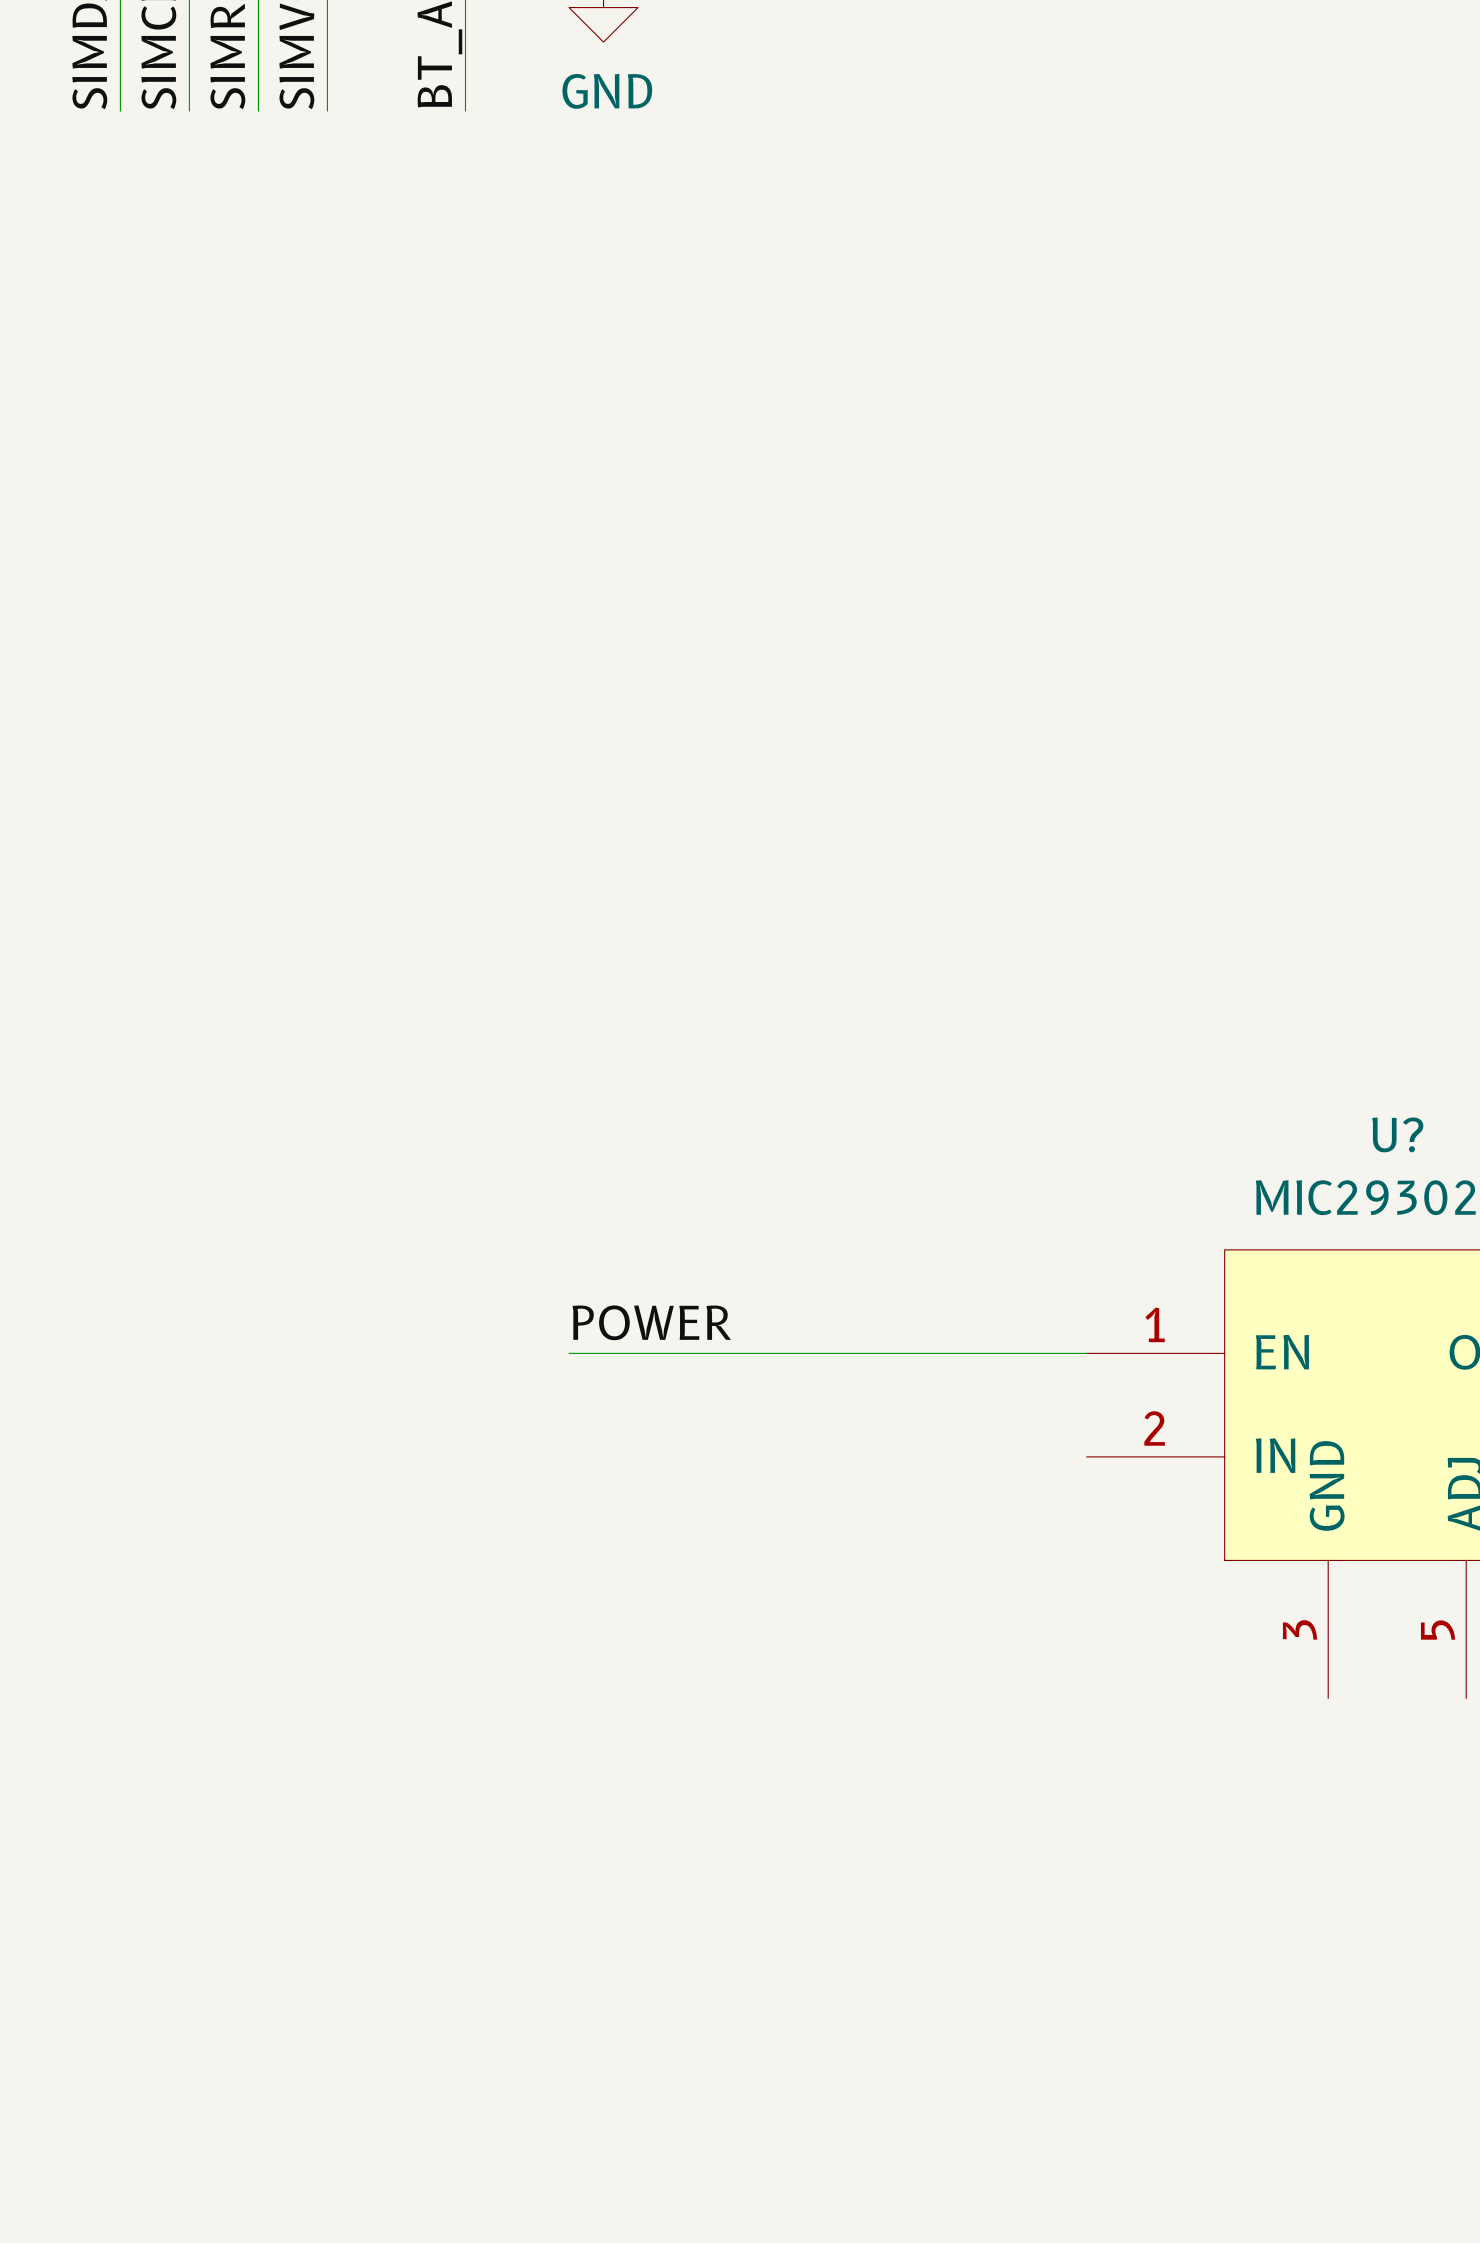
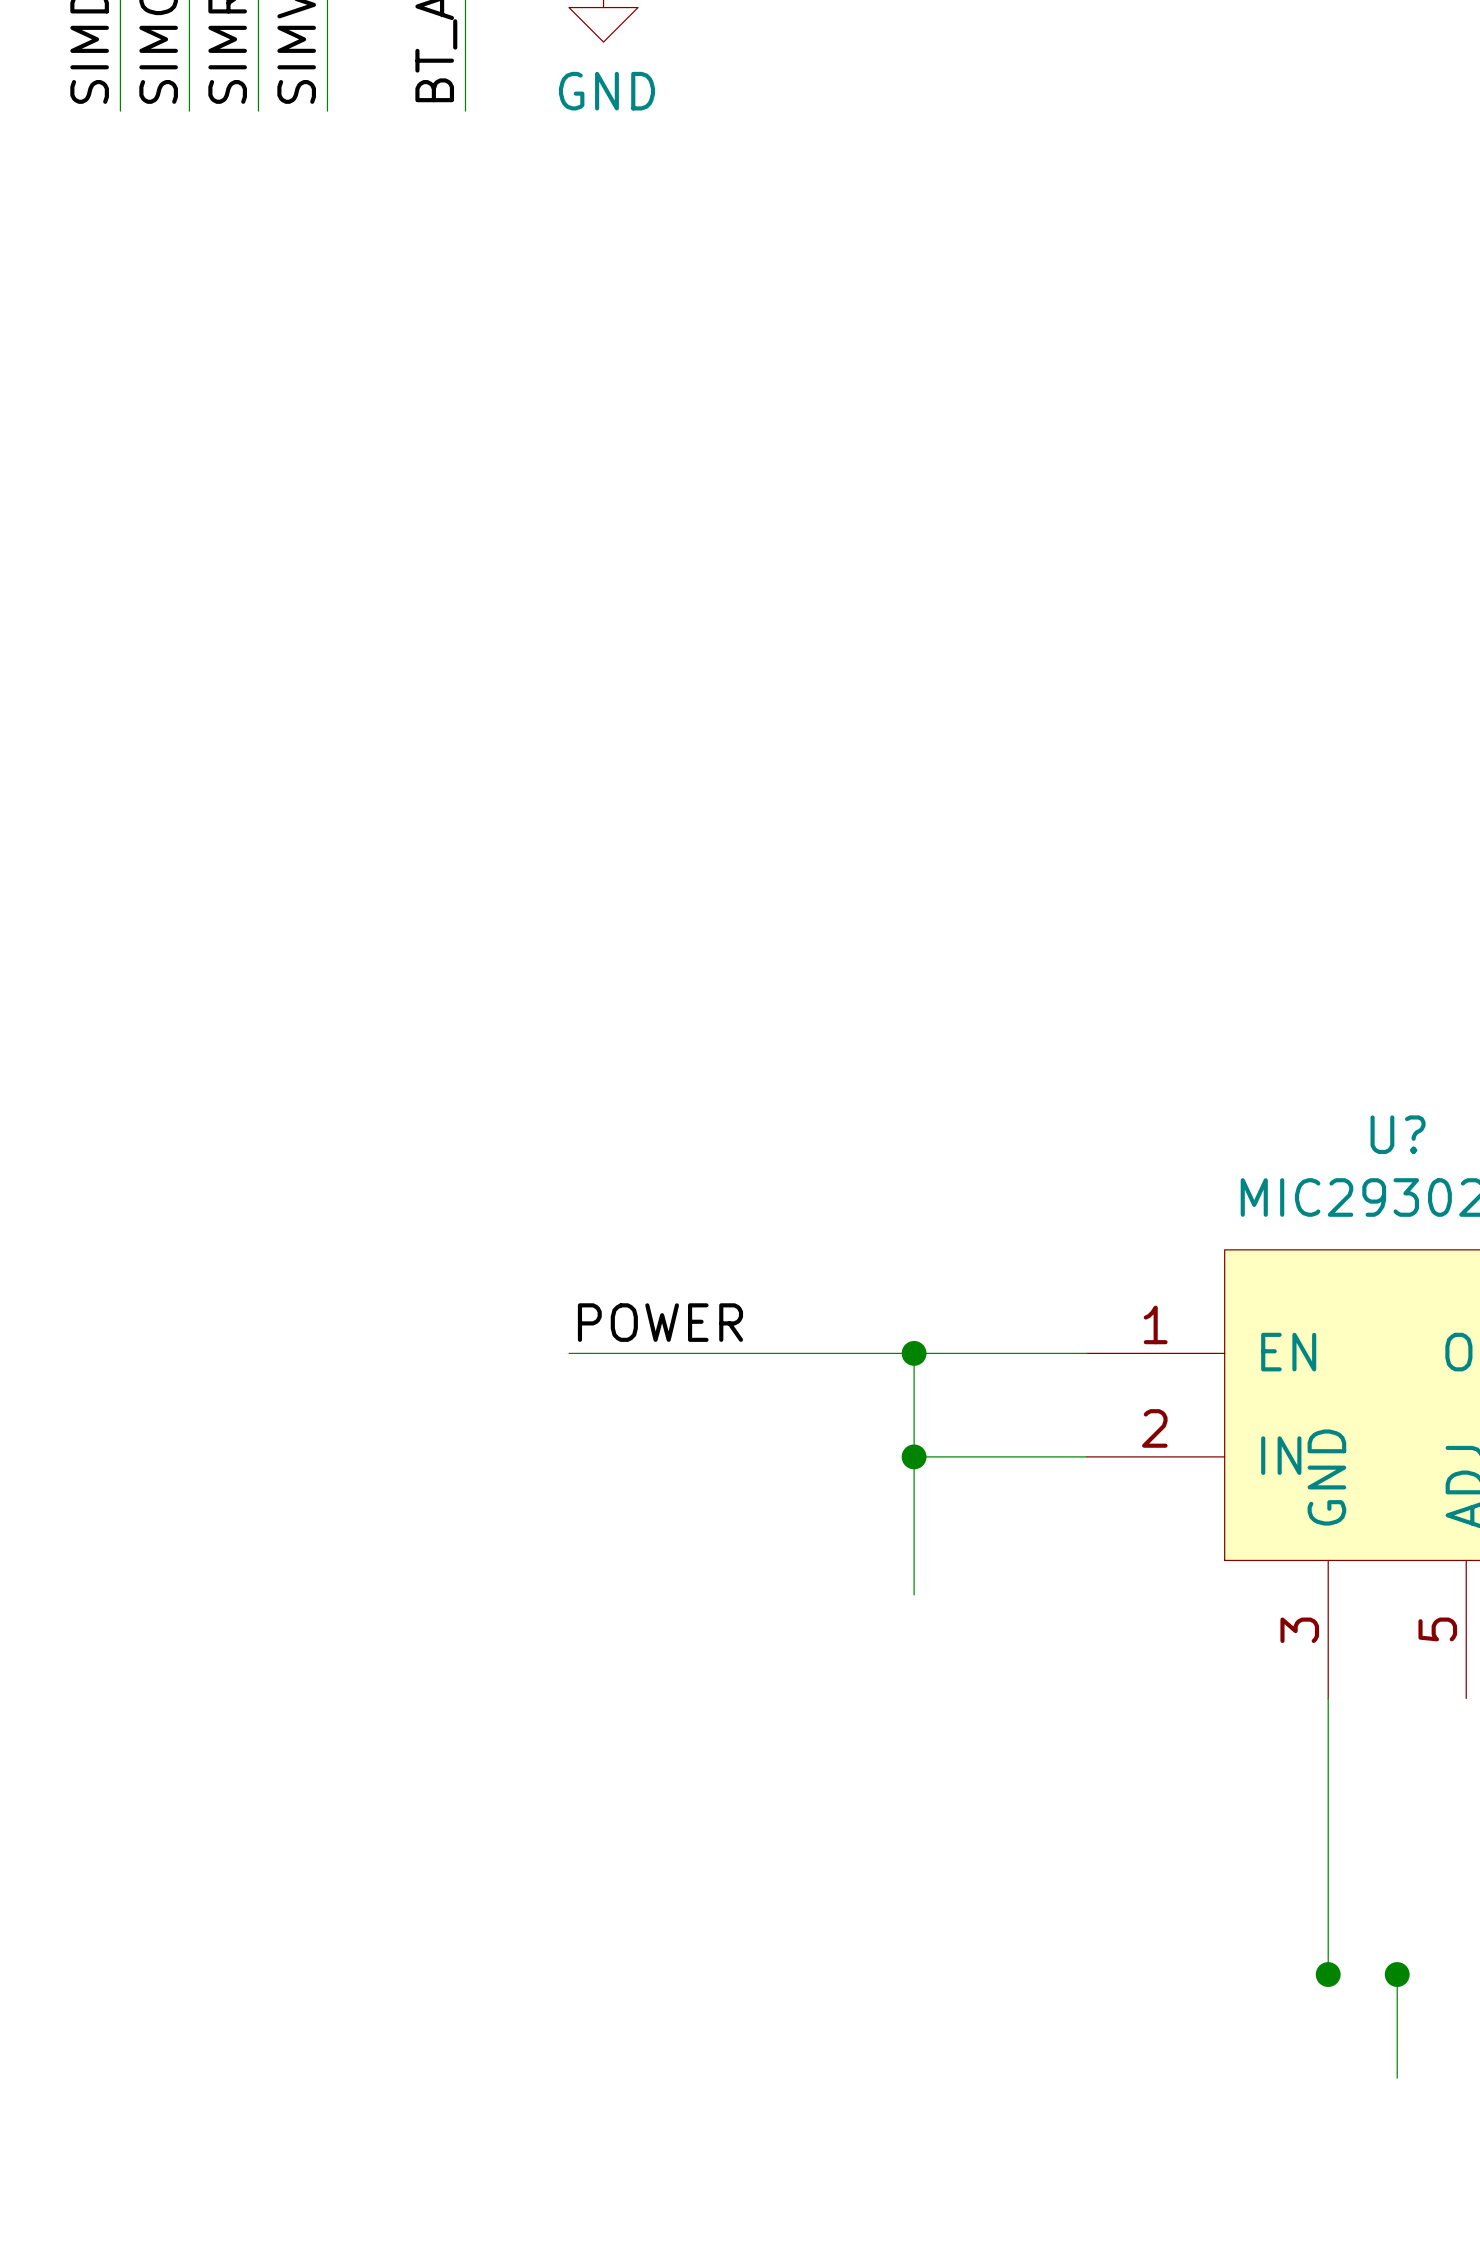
wire: none -> (914, 1353) (914, 1594)
junction: none -> (914, 1353)
wire: none -> (914, 1456) (1086, 1456)
junction: none -> (914, 1456)
wire: none -> (1328, 1698) (1328, 1974)
junction: none -> (1328, 1974)
wire: none -> (1397, 1974) (1397, 2078)
junction: none -> (1397, 1974)

